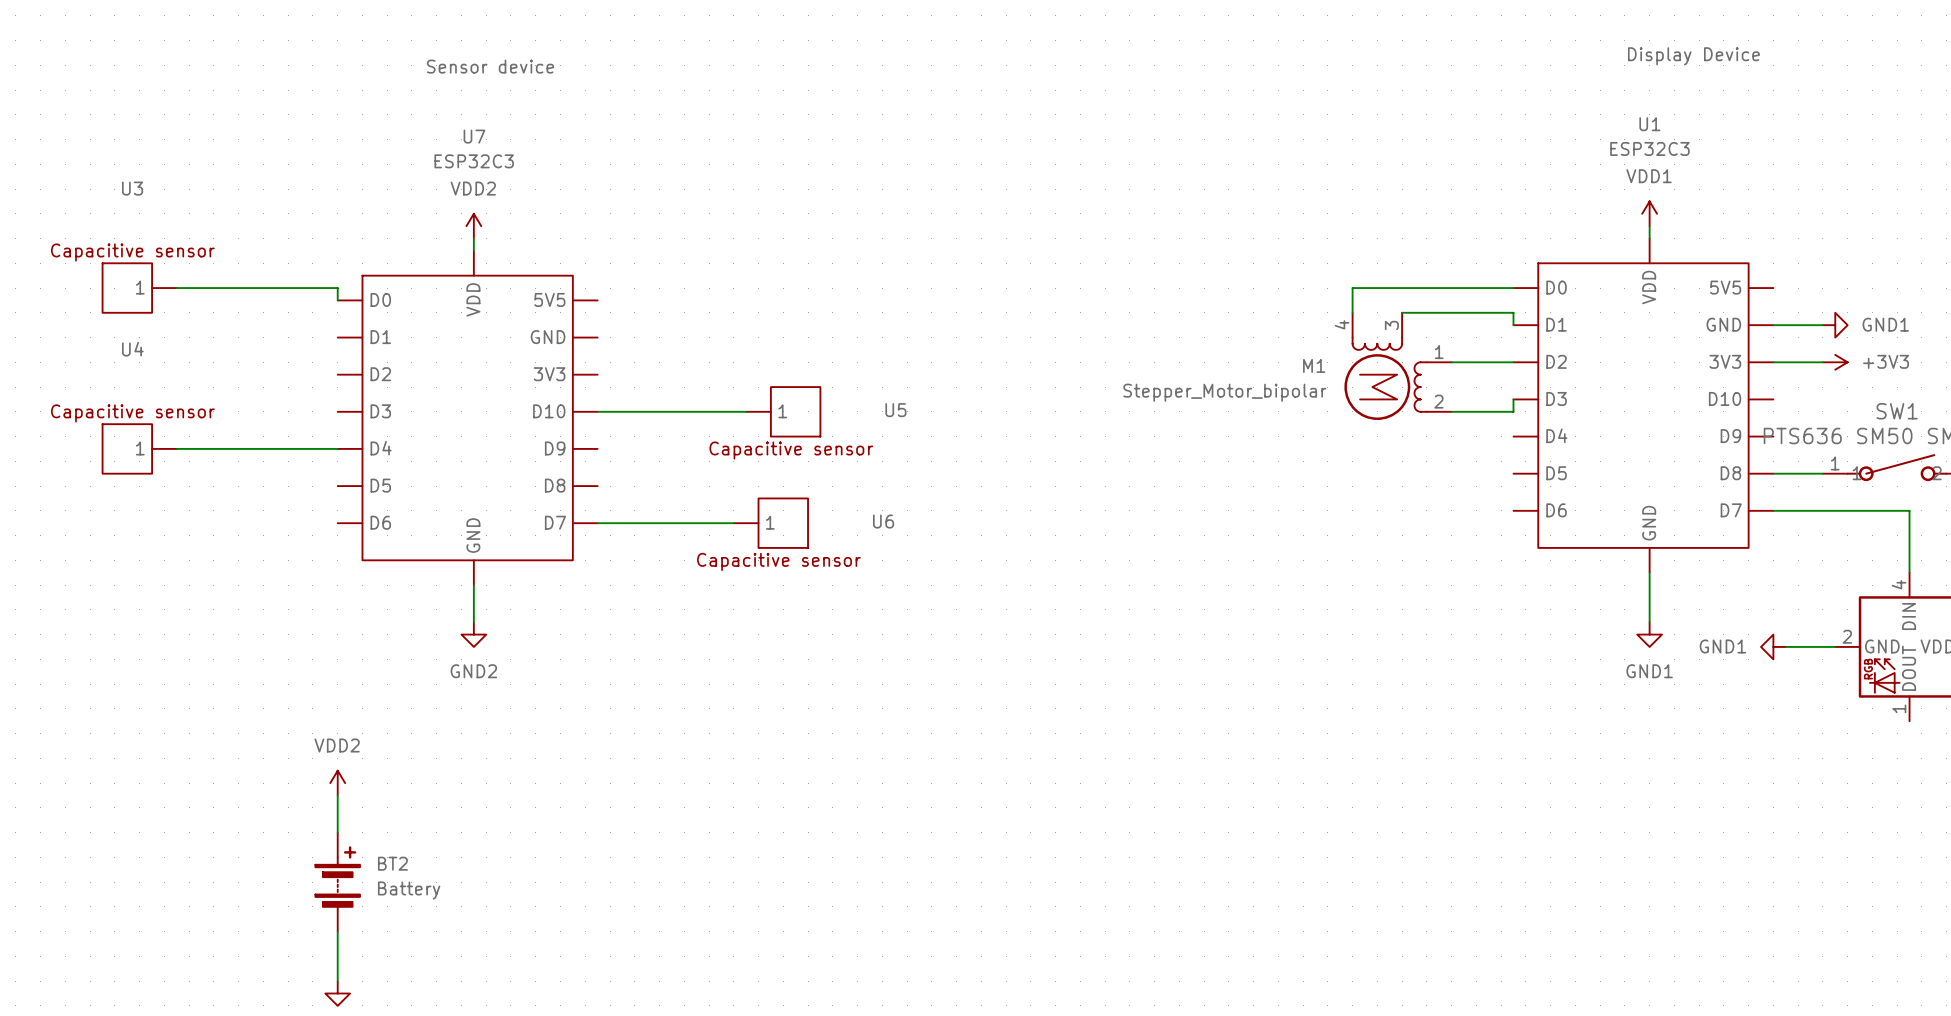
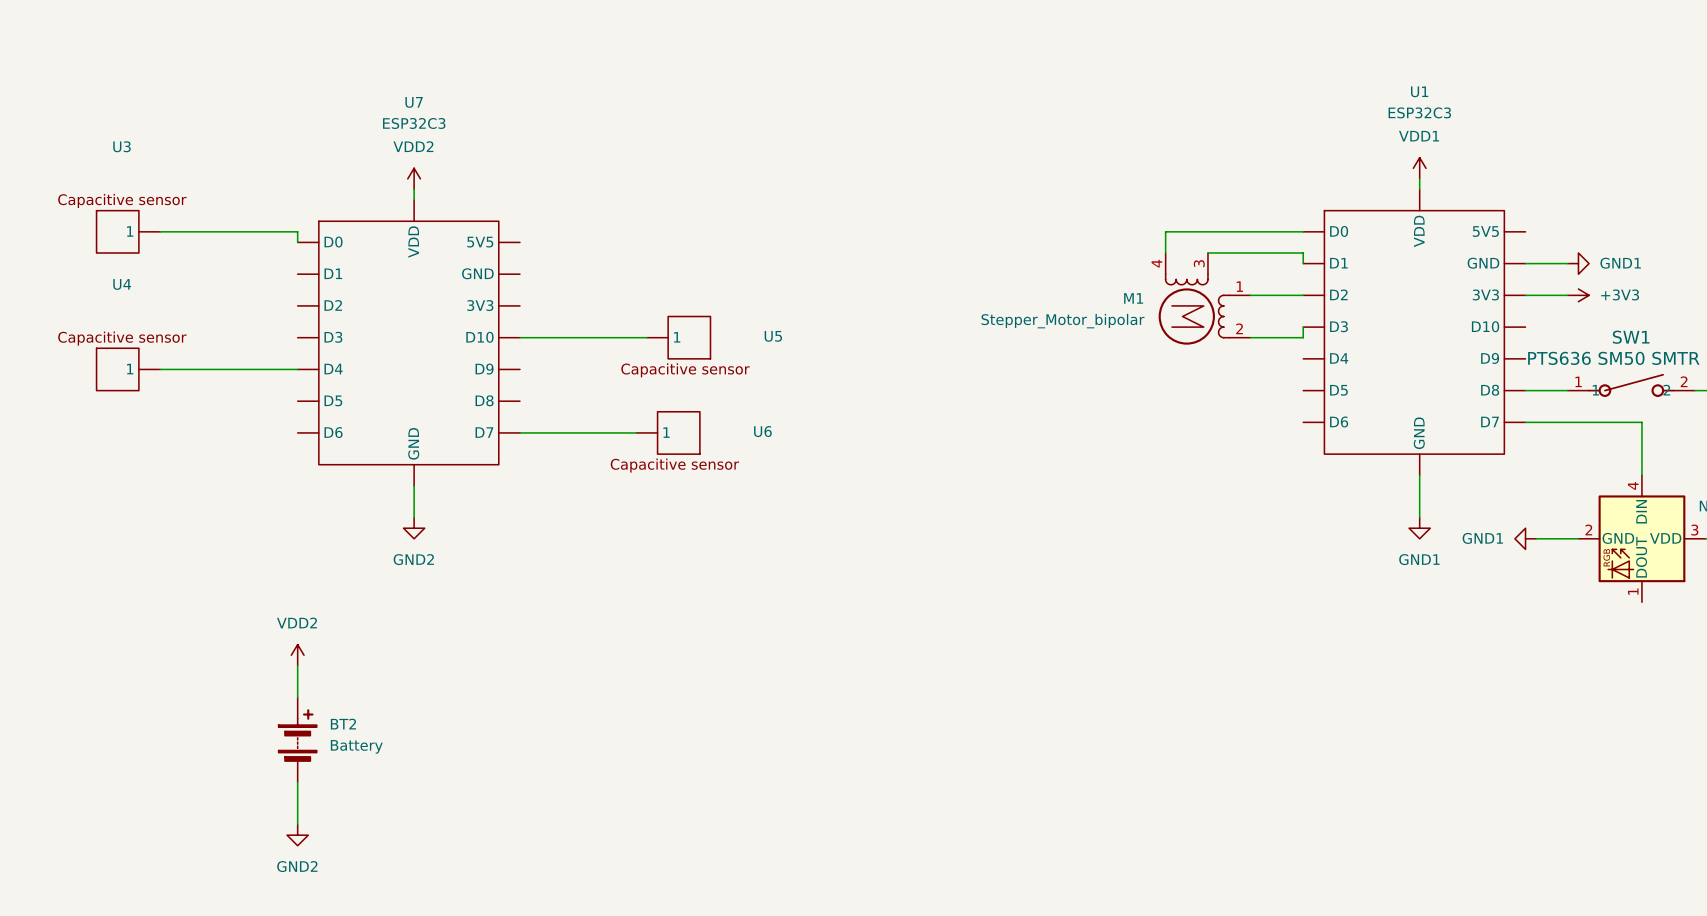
label: Display Device (1693, 56) -> none
label: Sensor device (490, 66) -> none

